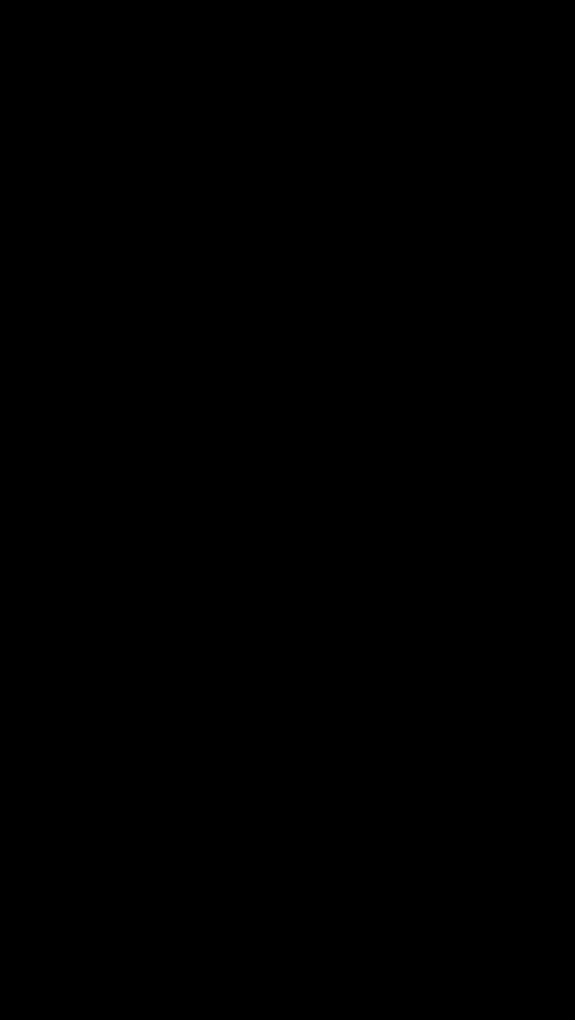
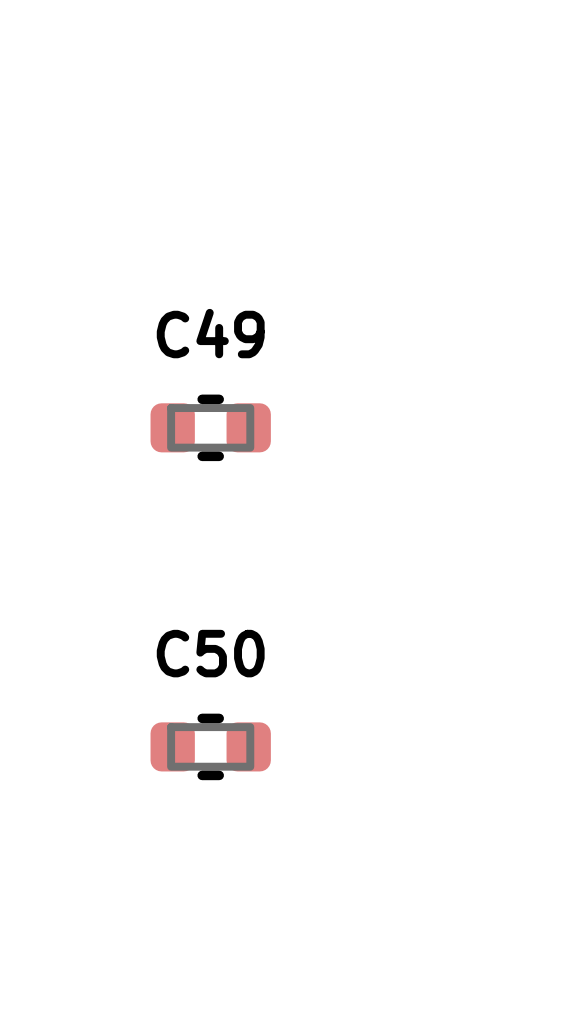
C49: none -> (210, 427)
C50: none -> (210, 746)

